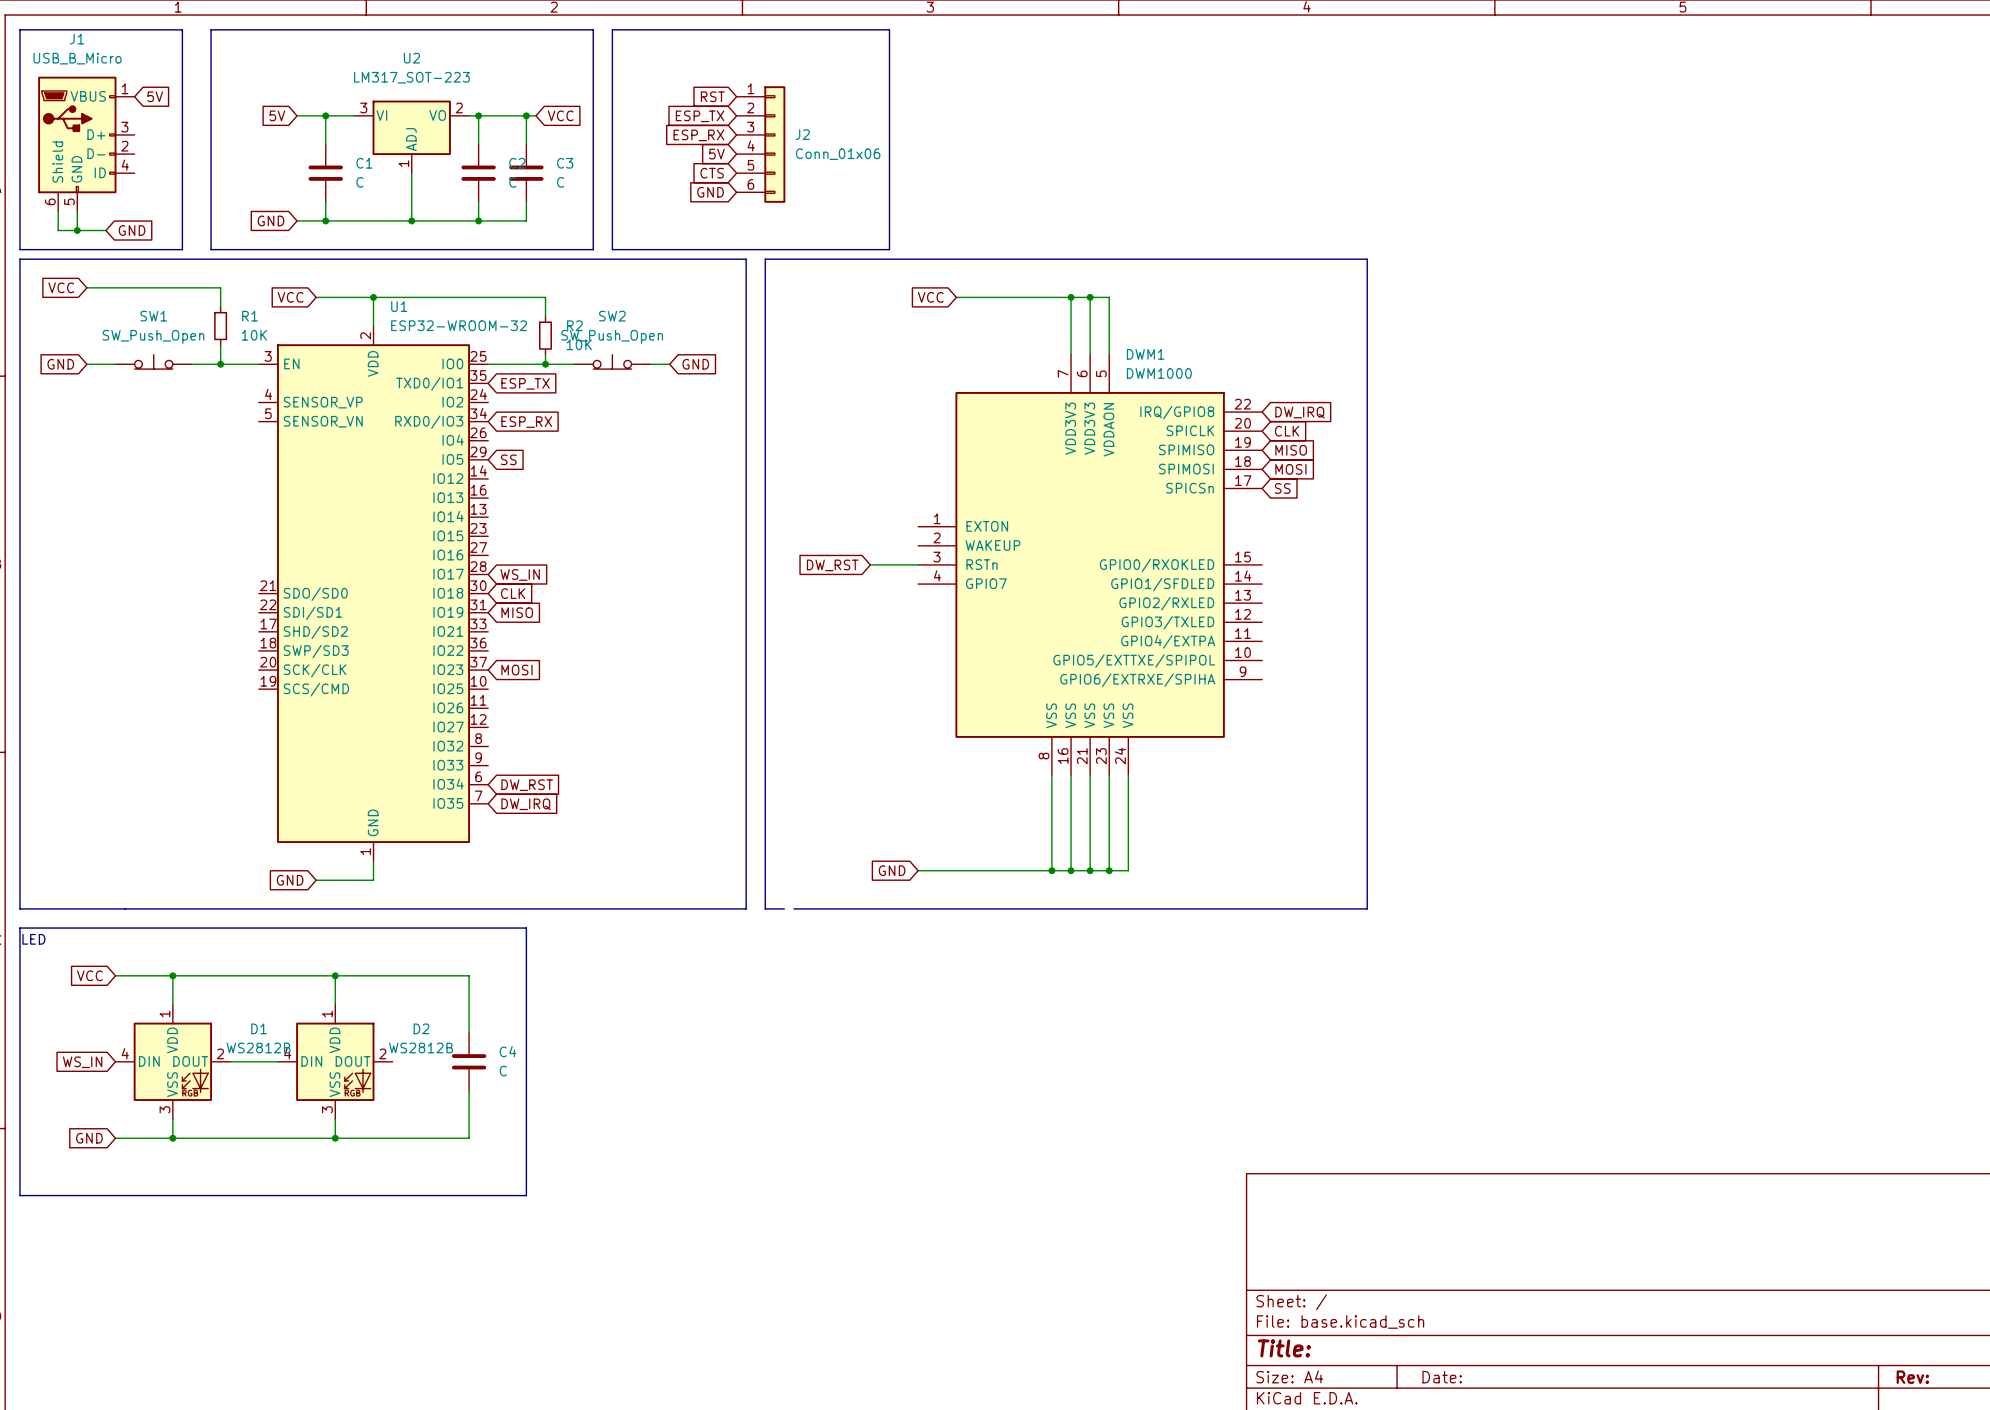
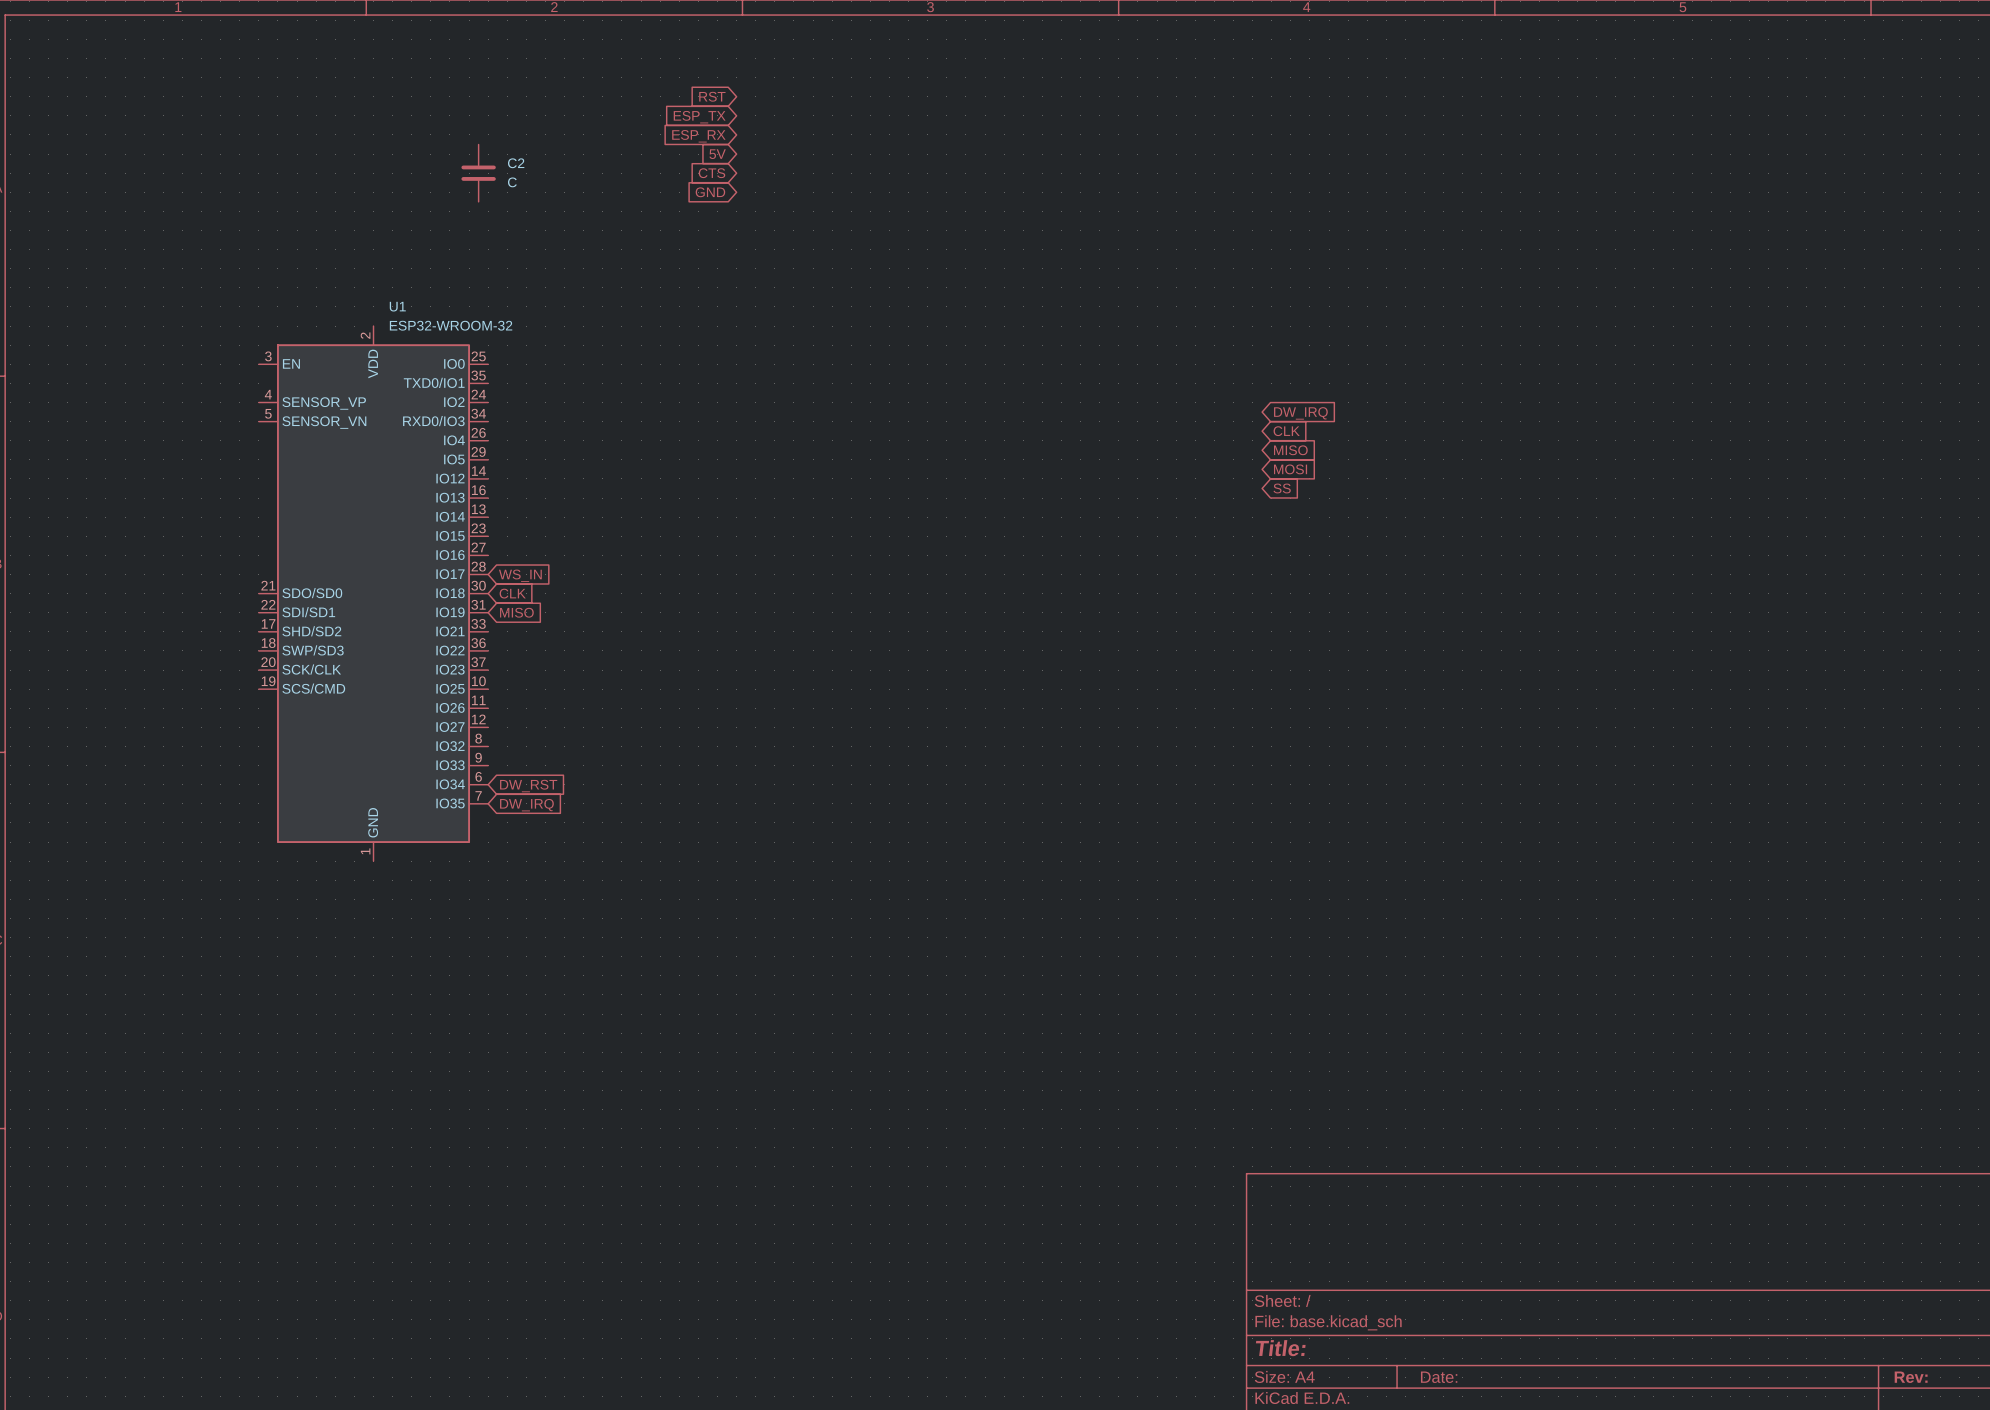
line: (19, 29) (19, 249) (182, 249) (182, 29) (19, 29) -> none
line: (211, 29) (593, 29) (593, 249) (211, 249) (211, 29) -> none
line: (612, 29) (889, 29) (889, 249) (612, 249) (612, 29) -> none
global label: 5V (155, 96) -> none
global label: 5V (277, 115) -> none
wire: (297, 115) (354, 115) -> none
wire: (325, 115) (325, 144) -> none
junction: (325, 115) -> none
wire: (469, 115) (535, 115) -> none
wire: (478, 115) (478, 144) -> none
junction: (478, 115) -> none
wire: (526, 115) (526, 144) -> none
junction: (526, 115) -> none
global label: VCC (560, 115) -> none
U2: LM317_SOT-223 (411, 136) -> none
J1: USB_B_Micro (86, 144) -> none
J2: Conn_01x06 (760, 144) -> none
C1: C (325, 173) -> none
wire: (411, 173) (411, 220) -> none
C3: C (526, 173) -> none
wire: (325, 201) (325, 220) -> none
wire: (478, 201) (478, 220) -> none
wire: (526, 201) (526, 220) (297, 220) -> none
wire: (58, 211) (58, 230) (105, 230) -> none
wire: (77, 211) (77, 230) -> none
global label: GND (271, 220) -> none
junction: (325, 220) -> none
junction: (411, 220) -> none
junction: (478, 220) -> none
junction: (77, 230) -> none
global label: GND (132, 230) -> none
line: (19, 259) (19, 908) (746, 908) (746, 259) (19, 259) -> none
global label: VCC (61, 287) -> none
wire: (86, 287) (220, 287) (220, 306) -> none
global label: VCC (290, 297) -> none
wire: (316, 297) (545, 297) (545, 316) -> none
wire: (373, 297) (373, 326) -> none
junction: (373, 297) -> none
global label: VCC (930, 297) -> none
wire: (956, 297) (1109, 297) (1109, 354) -> none
wire: (1071, 297) (1071, 354) -> none
junction: (1071, 297) -> none
wire: (1090, 297) (1090, 354) -> none
junction: (1090, 297) -> none
R1: 10K (220, 326) -> none
R2: 10K (545, 335) -> none
wire: (220, 345) (220, 364) -> none
wire: (545, 354) (545, 364) -> none
SW1: SW_Push_Open (153, 361) -> none
SW2: SW_Push_Open (612, 361) -> none
global label: GND (60, 364) -> none
wire: (86, 364) (115, 364) -> none
wire: (191, 364) (258, 364) -> none
junction: (220, 364) -> none
wire: (488, 364) (574, 364) -> none
junction: (545, 364) -> none
wire: (650, 364) (669, 364) -> none
global label: GND (695, 364) -> none
global label: ESP_TX (525, 383) -> none
global label: ESP_RX (526, 422) -> none
global label: SS (508, 459) -> none
wire: (870, 564) (918, 564) -> none
DWM1: DWM1000 (1090, 564) -> none
global label: DW_RST (832, 565) -> none
global label: MOSI (516, 670) -> none
wire: (1051, 775) (1051, 870) -> none
wire: (1071, 775) (1071, 870) -> none
wire: (1090, 775) (1090, 870) -> none
wire: (1109, 775) (1109, 870) -> none
wire: (1128, 775) (1128, 870) (918, 870) -> none
wire: (373, 861) (373, 880) (316, 880) -> none
global label: GND (892, 870) -> none
junction: (1051, 870) -> none
junction: (1071, 870) -> none
junction: (1090, 870) -> none
junction: (1109, 870) -> none
global label: GND (290, 880) -> none
line: (784, 908) (765, 908) (765, 259) (1367, 259) (1367, 908) (793, 908) -> none
line: (19, 928) (19, 1195) (526, 1195) (526, 928) (19, 928) -> none
text: LED (33, 939) -> none
global label: VCC (89, 975) -> none
wire: (115, 975) (469, 975) (469, 1033) -> none
wire: (172, 975) (172, 1004) -> none
junction: (172, 975) -> none
wire: (335, 975) (335, 1004) -> none
junction: (335, 975) -> none
D1: WS2812B (172, 1061) -> none
wire: (230, 1061) (277, 1061) -> none
D2: WS2812B (335, 1061) -> none
C4: C (469, 1061) -> none
global label: WS_IN (82, 1062) -> none
wire: (469, 1090) (469, 1138) (115, 1138) -> none
wire: (172, 1119) (172, 1138) -> none
wire: (335, 1119) (335, 1138) -> none
global label: GND (89, 1138) -> none
junction: (172, 1138) -> none
junction: (335, 1138) -> none

